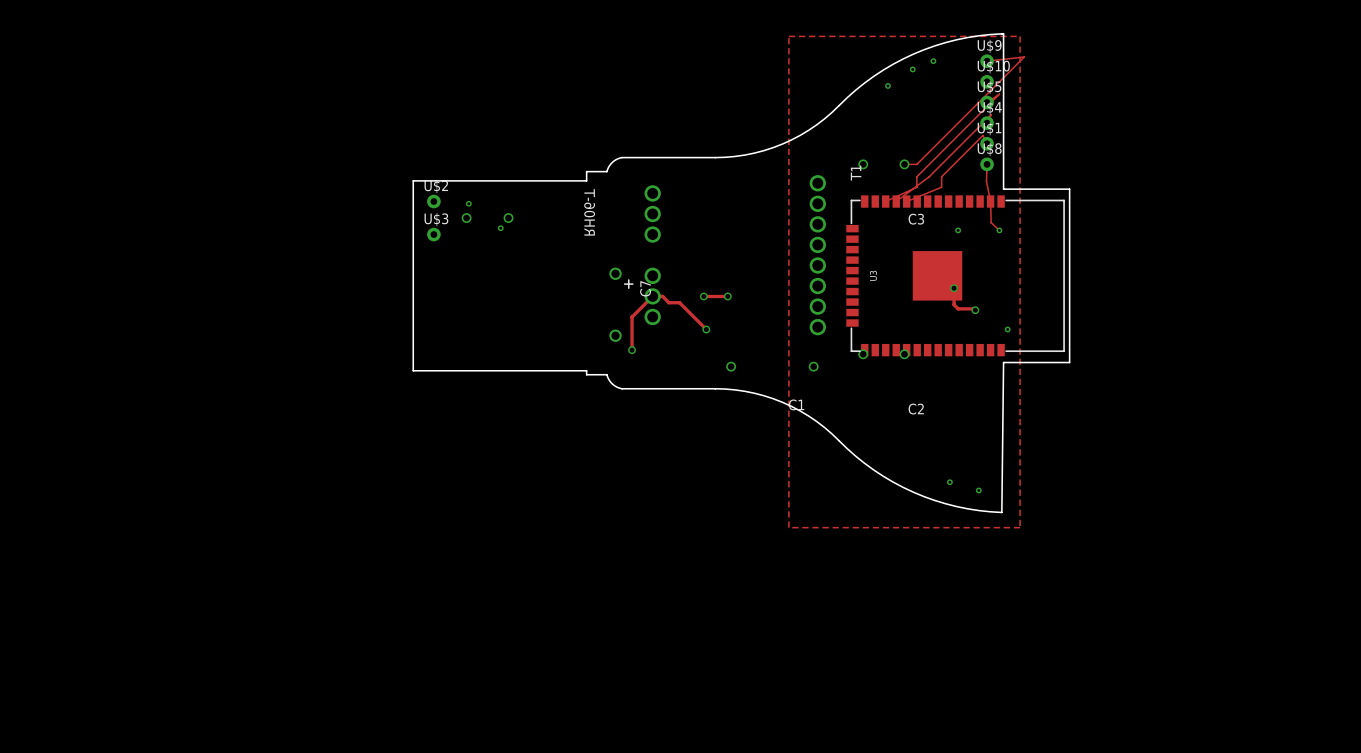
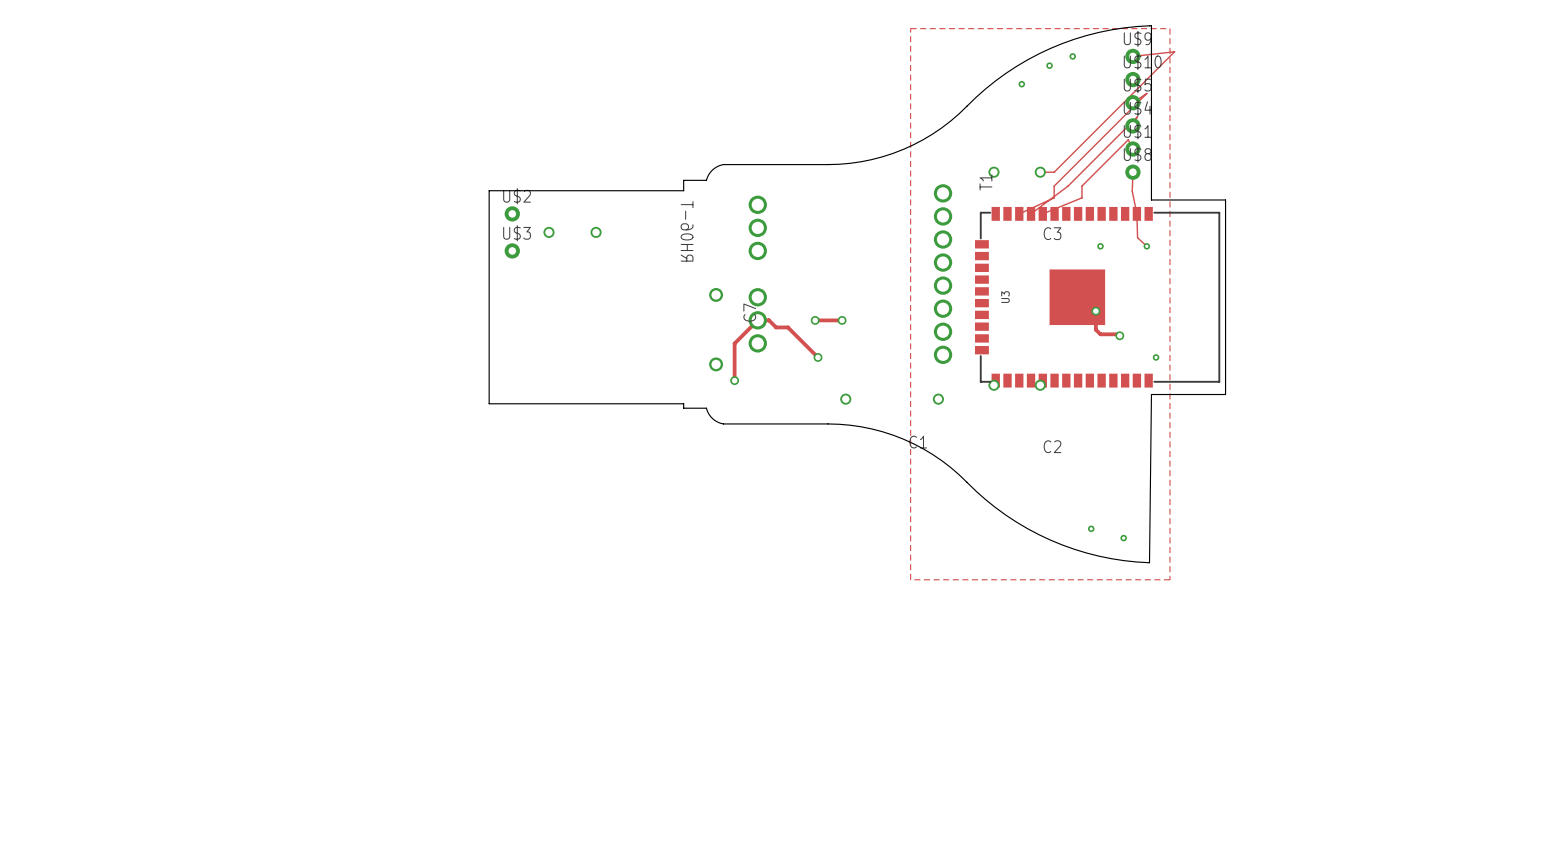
via: (468, 203) -> none
via: (500, 228) -> none
C7 footprint: [609, 267, 634, 342] -> [709, 287, 724, 372]

